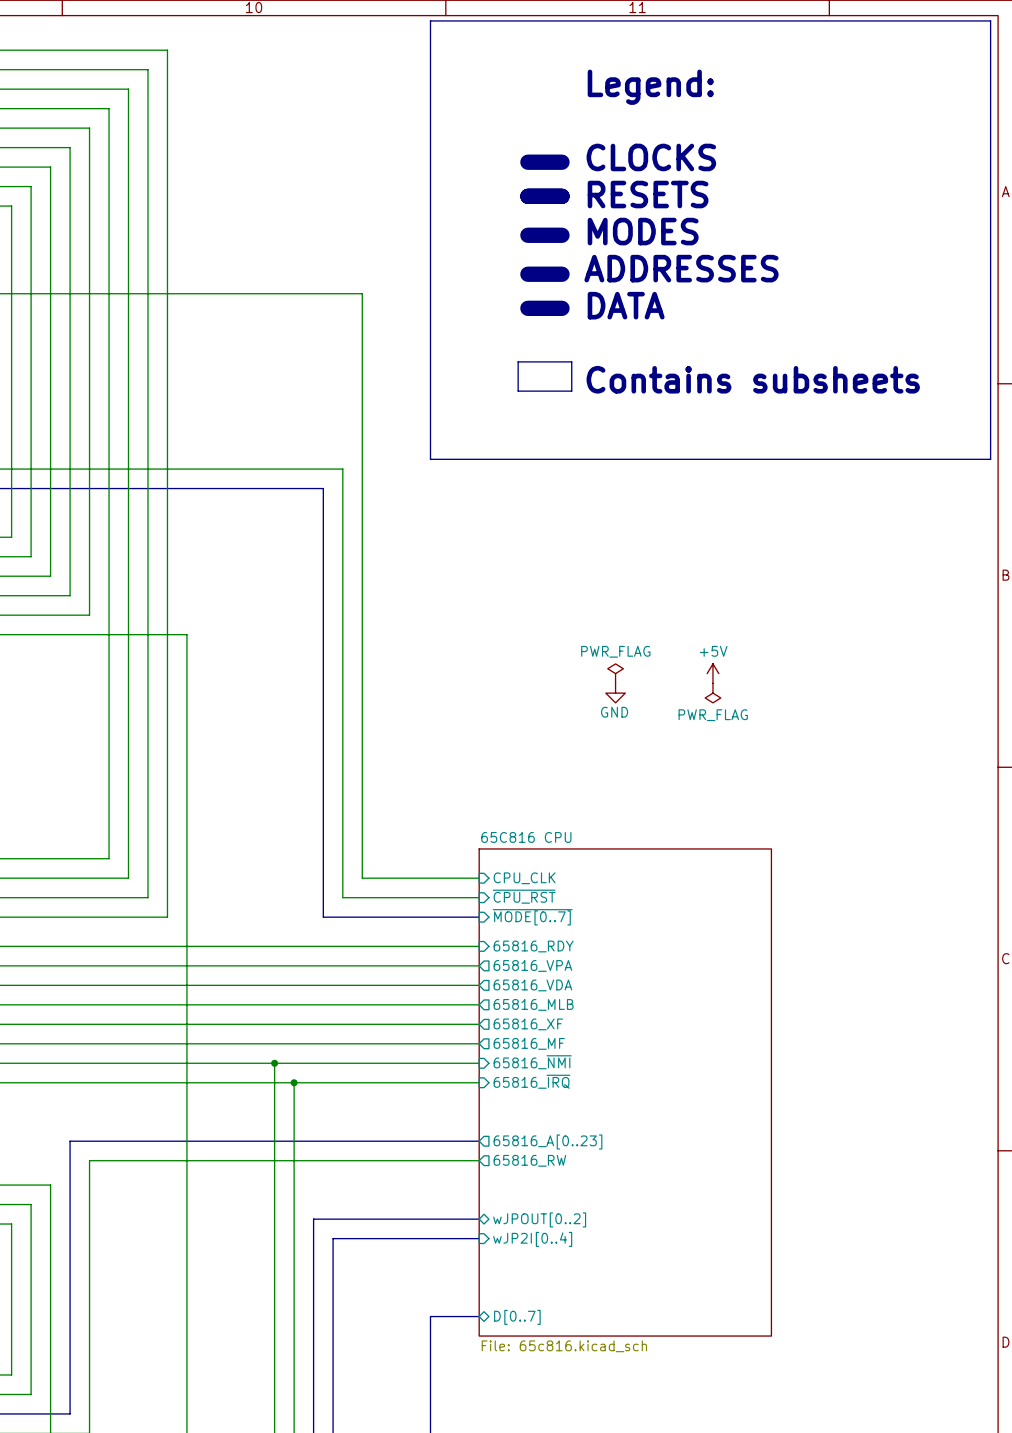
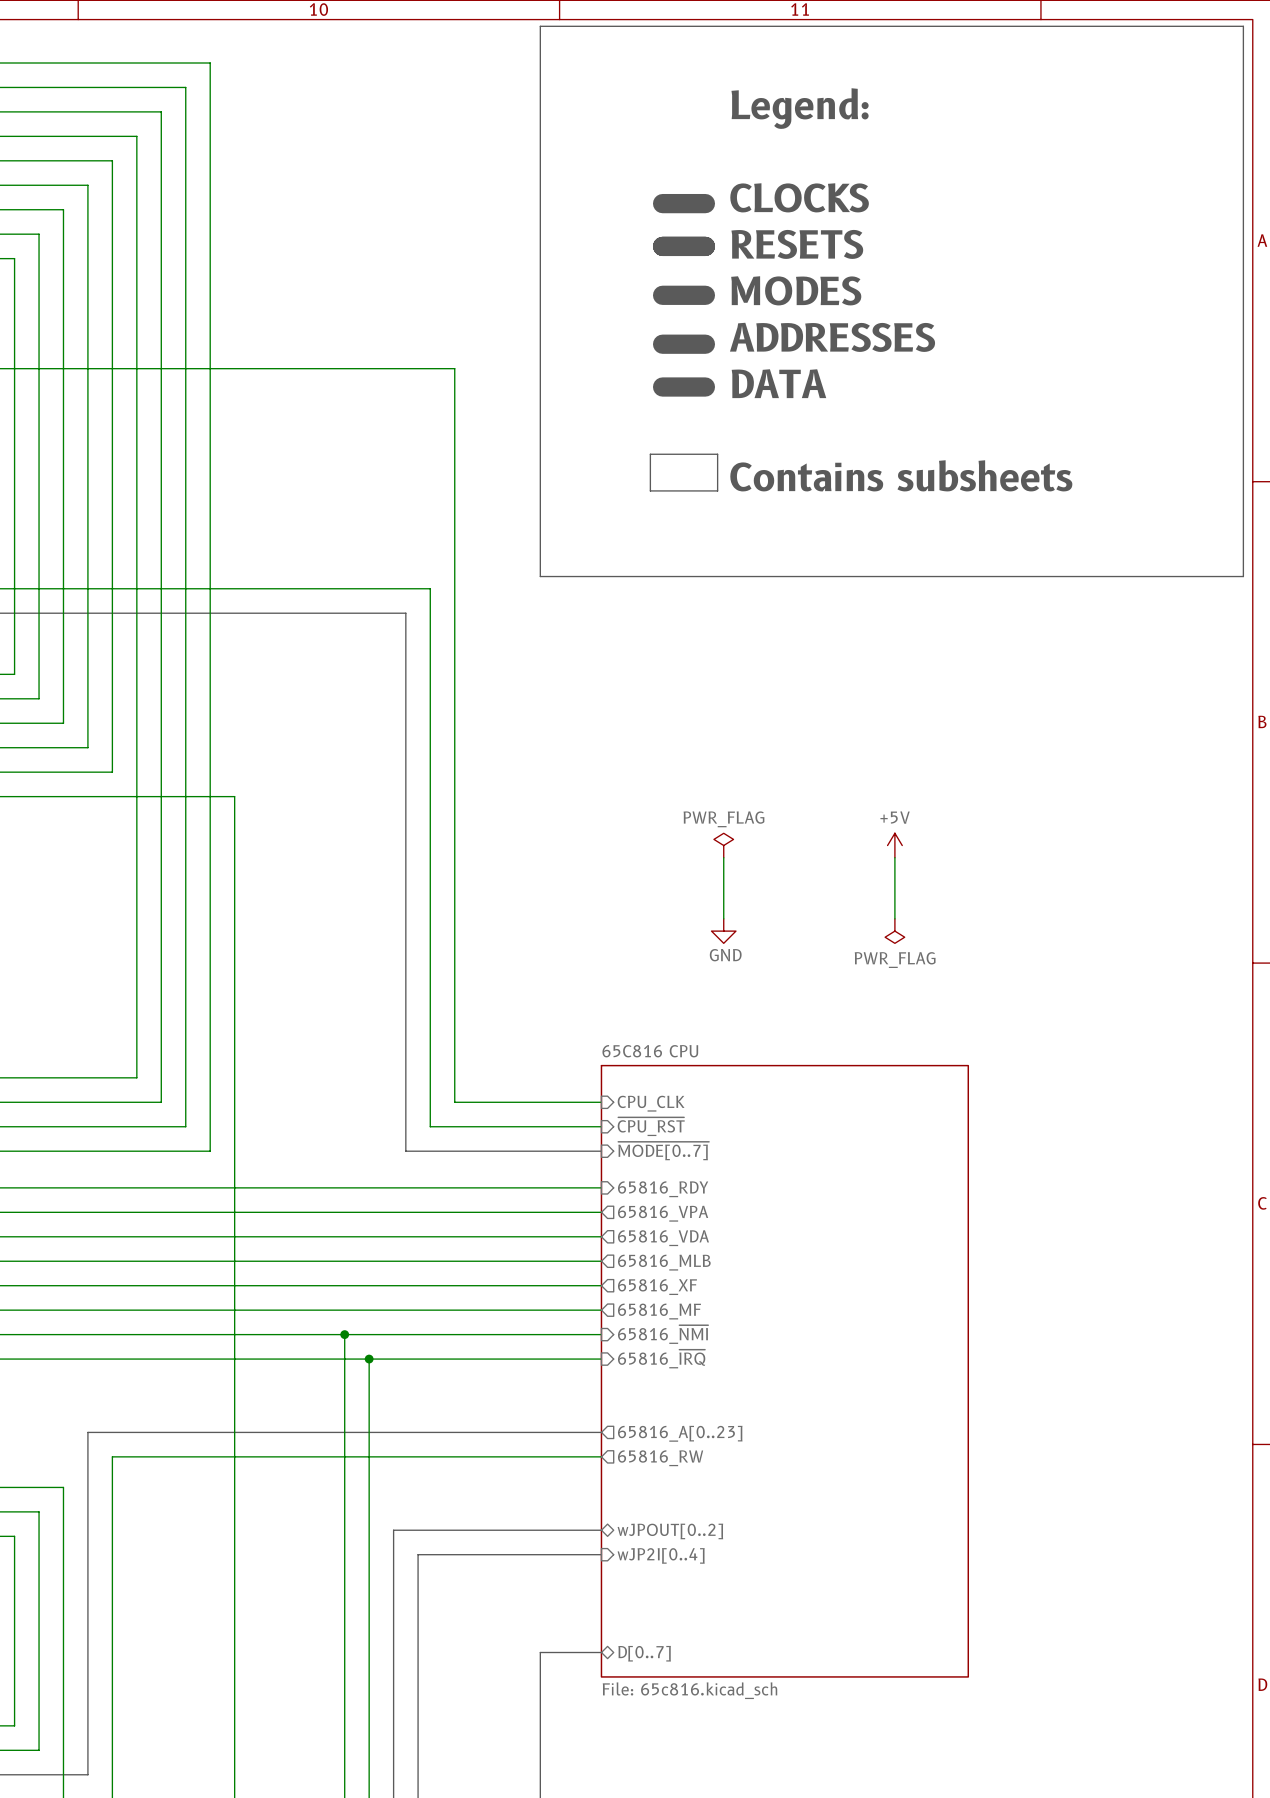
power symbol position: PWR_FLAG (615, 673) -> PWR_FLAG (723, 845)
wire: none -> (723, 857) (723, 918)
wire: none -> (894, 857) (894, 918)
power symbol position: GND (615, 693) -> GND (723, 931)
power symbol position: PWR_FLAG (712, 693) -> PWR_FLAG (894, 931)

